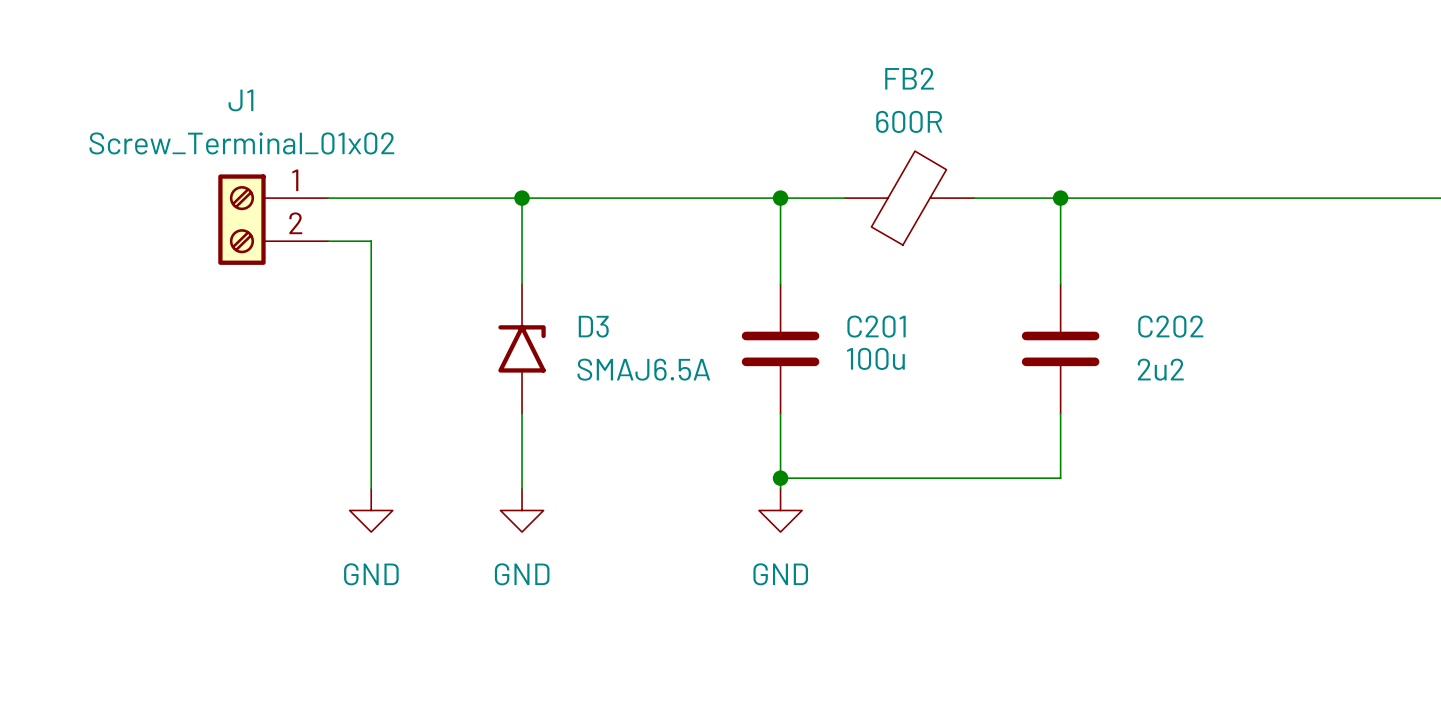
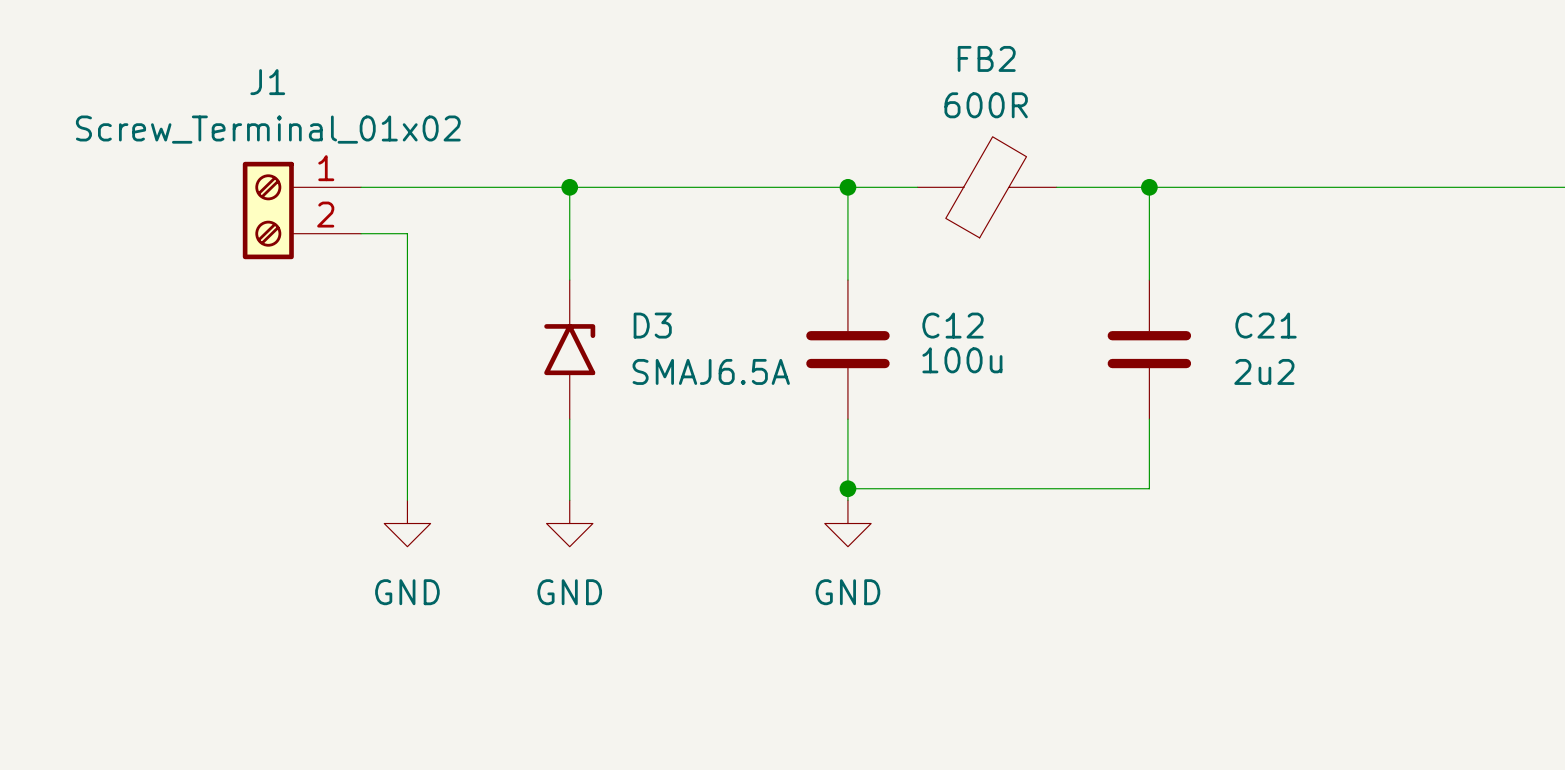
C201 name: C201 (876, 326) -> C12 (953, 325)
C202 name: C202 (1170, 326) -> C21 (1266, 325)

